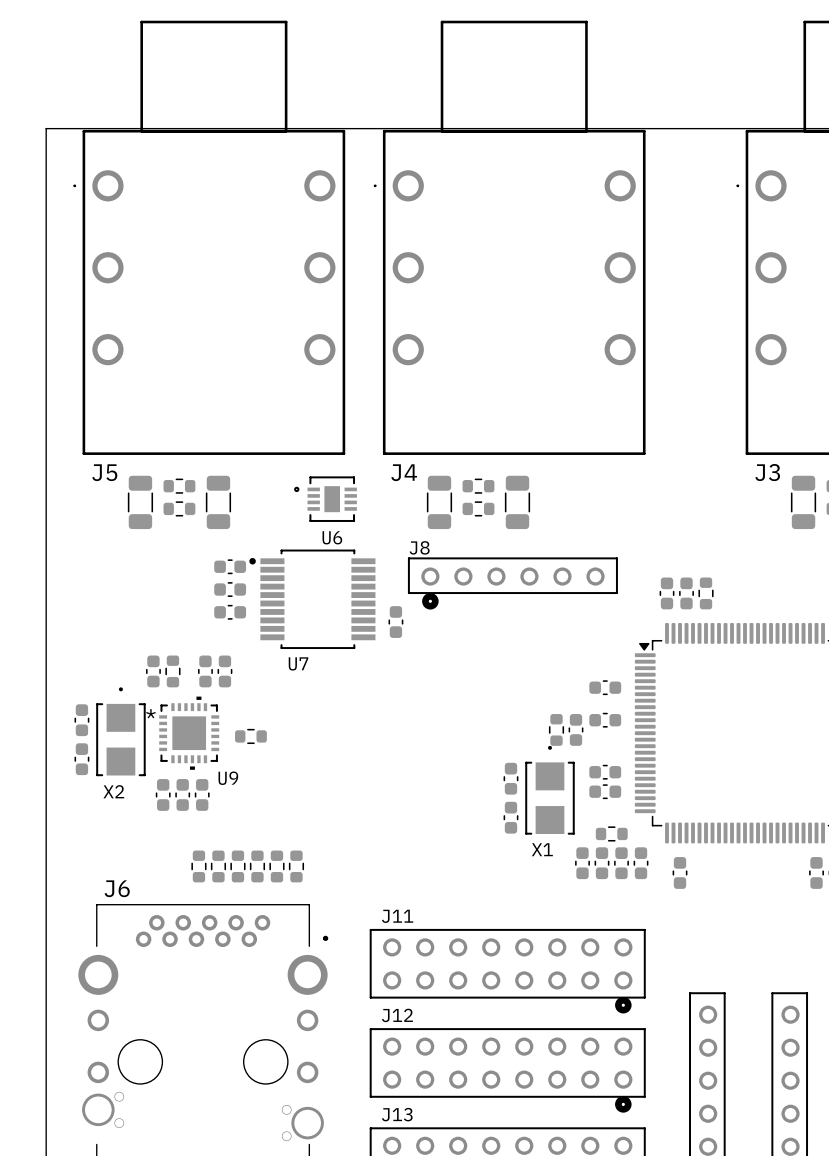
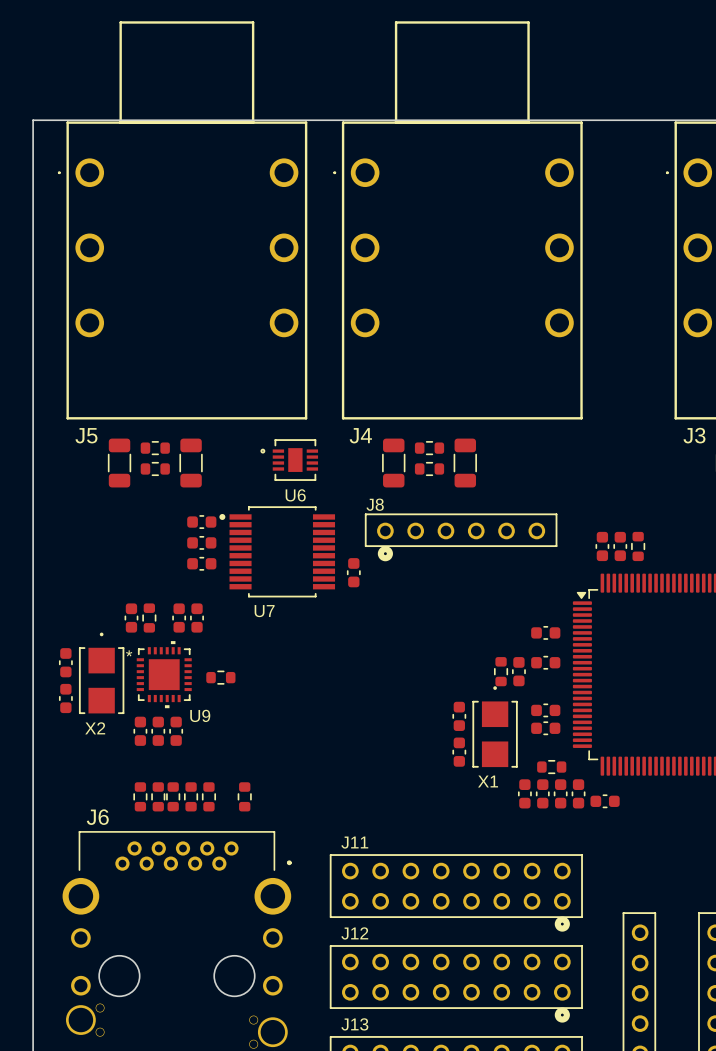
part: none -> (140, 796)
part: none -> (158, 796)
part: (257, 866) -> none
part: (296, 866) -> none
part rotation: 0° (680, 872) -> 90° clockwise (605, 801)

